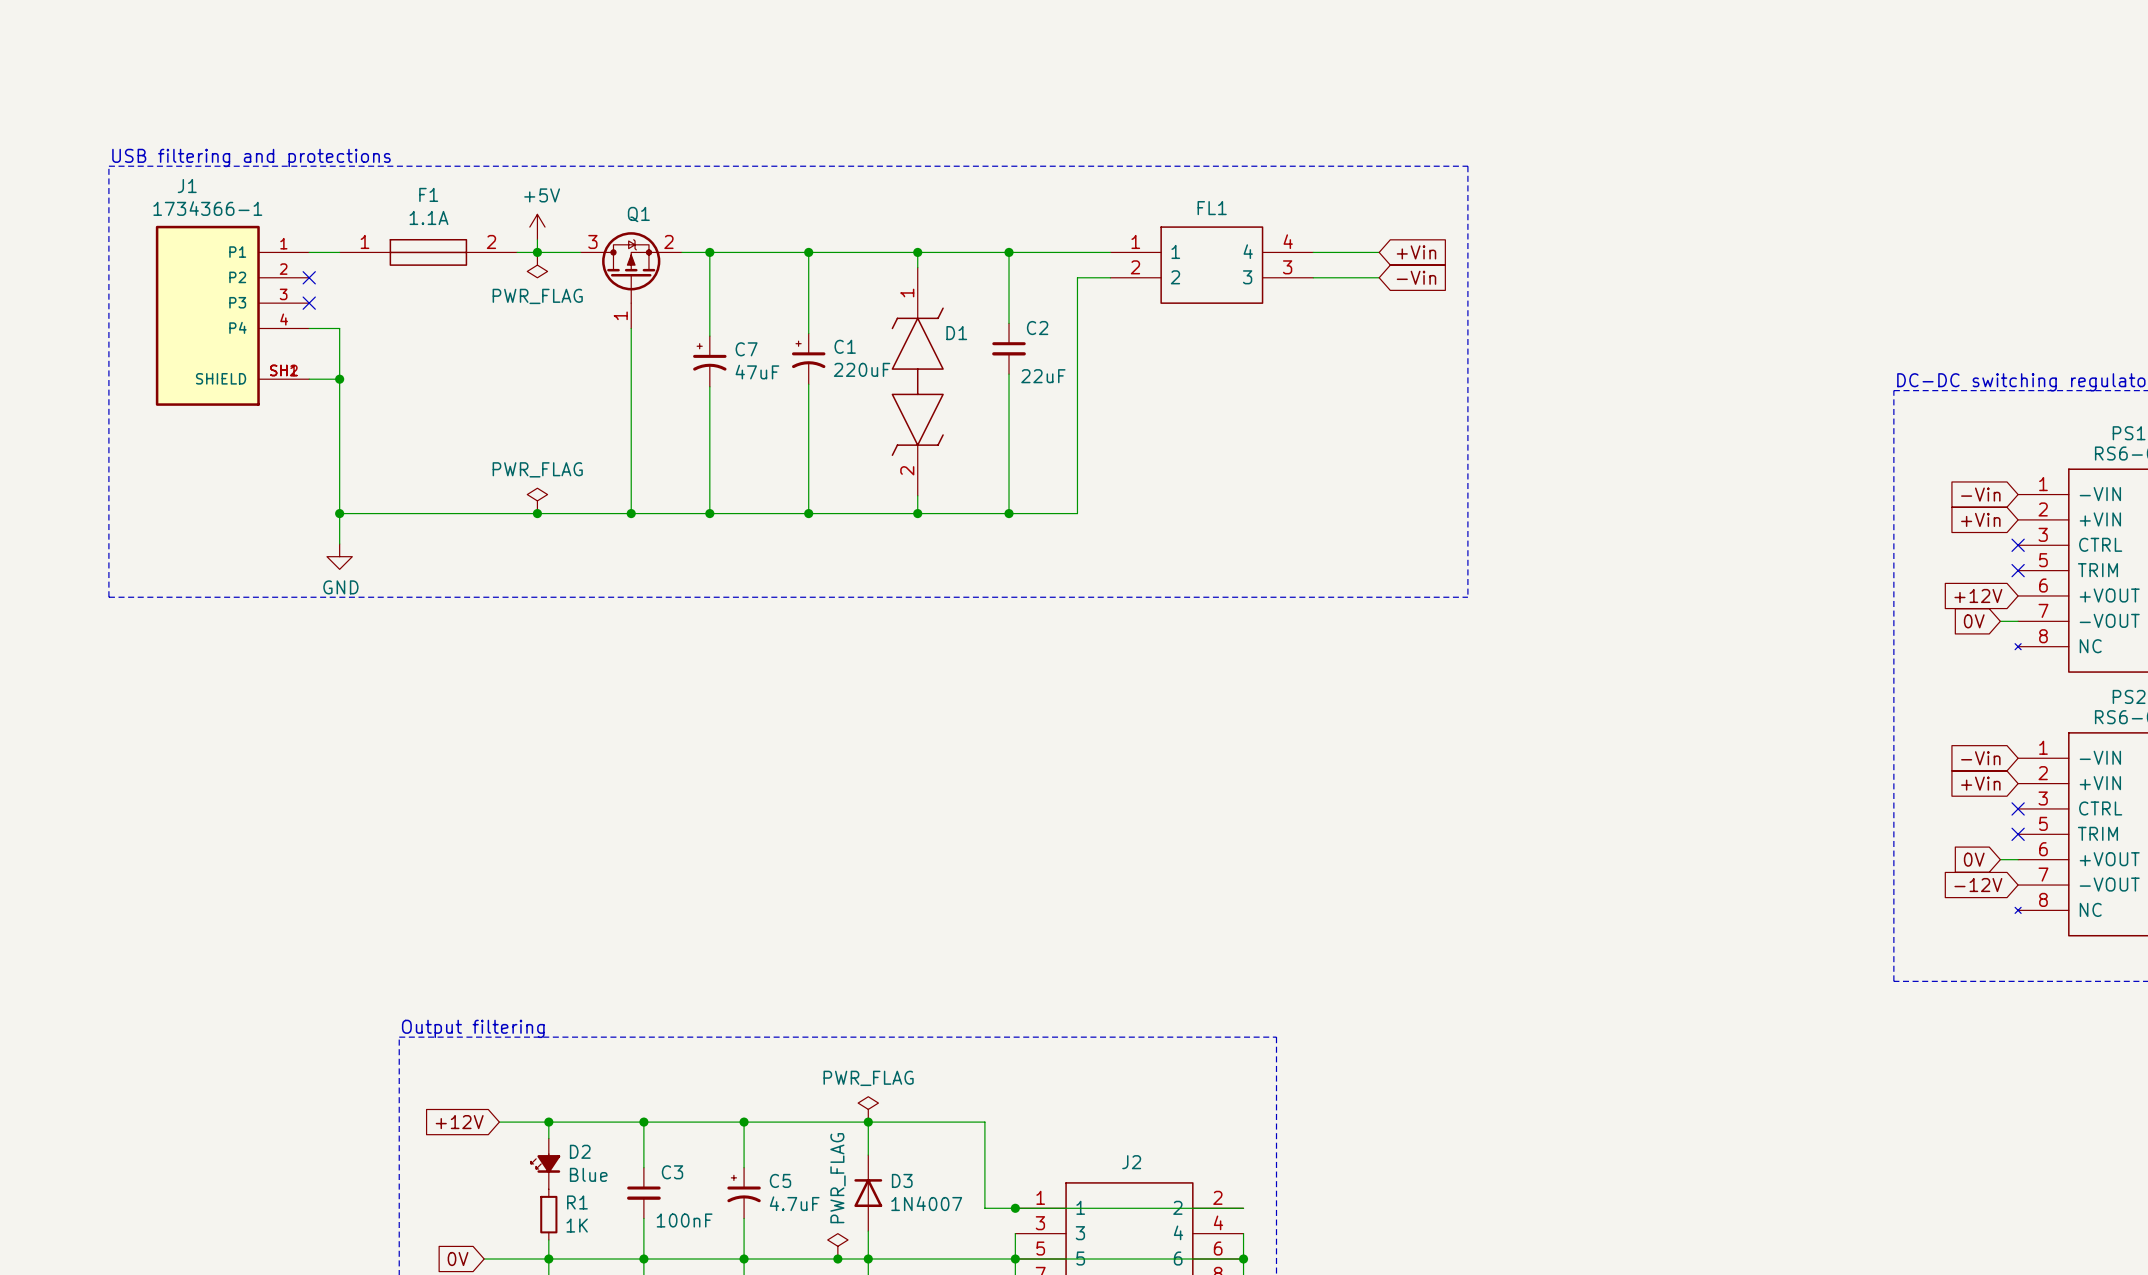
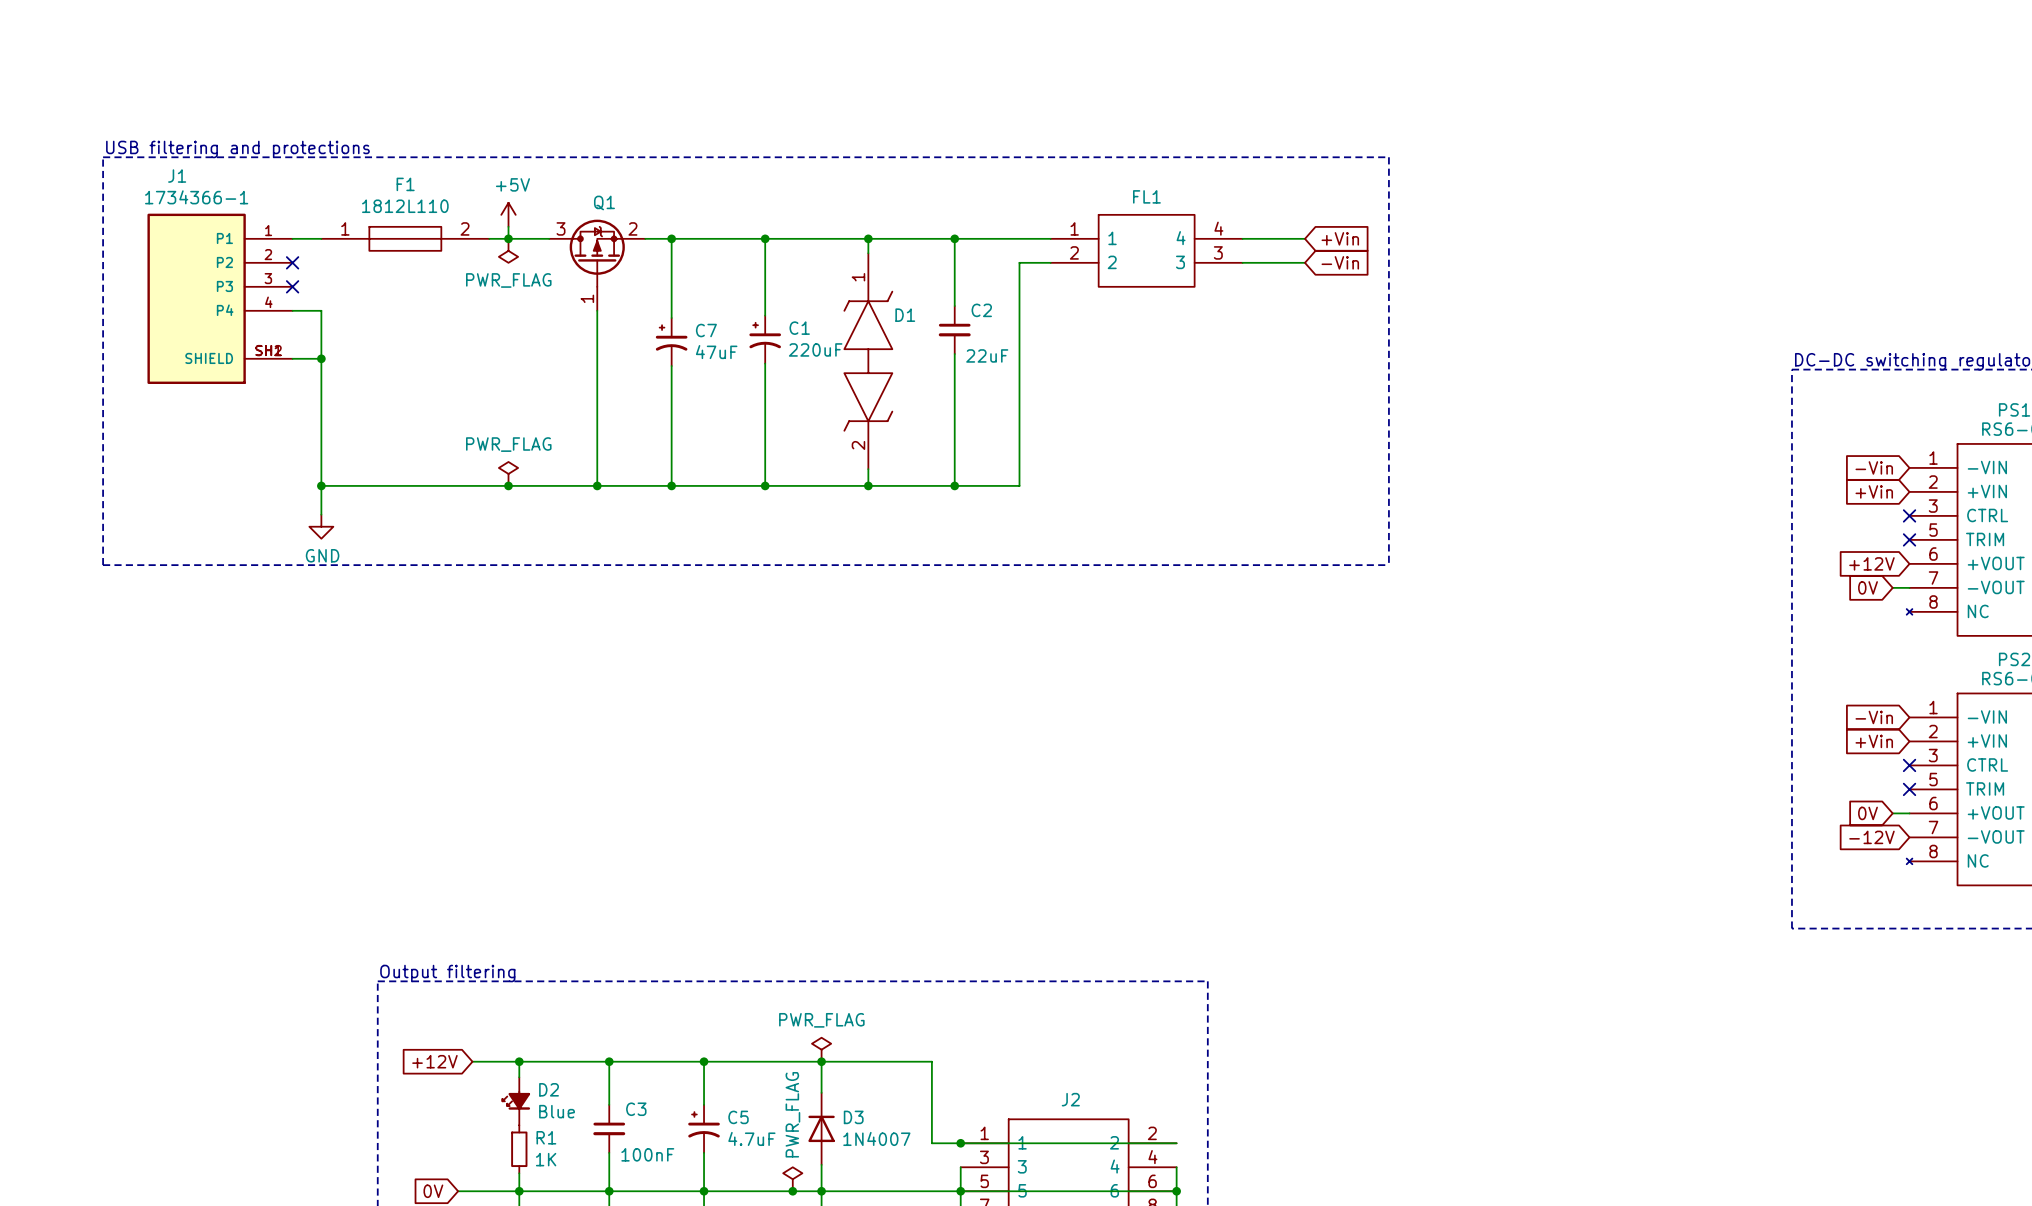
F1 value: 1.1A (428, 217) -> 1812L110 (405, 206)

